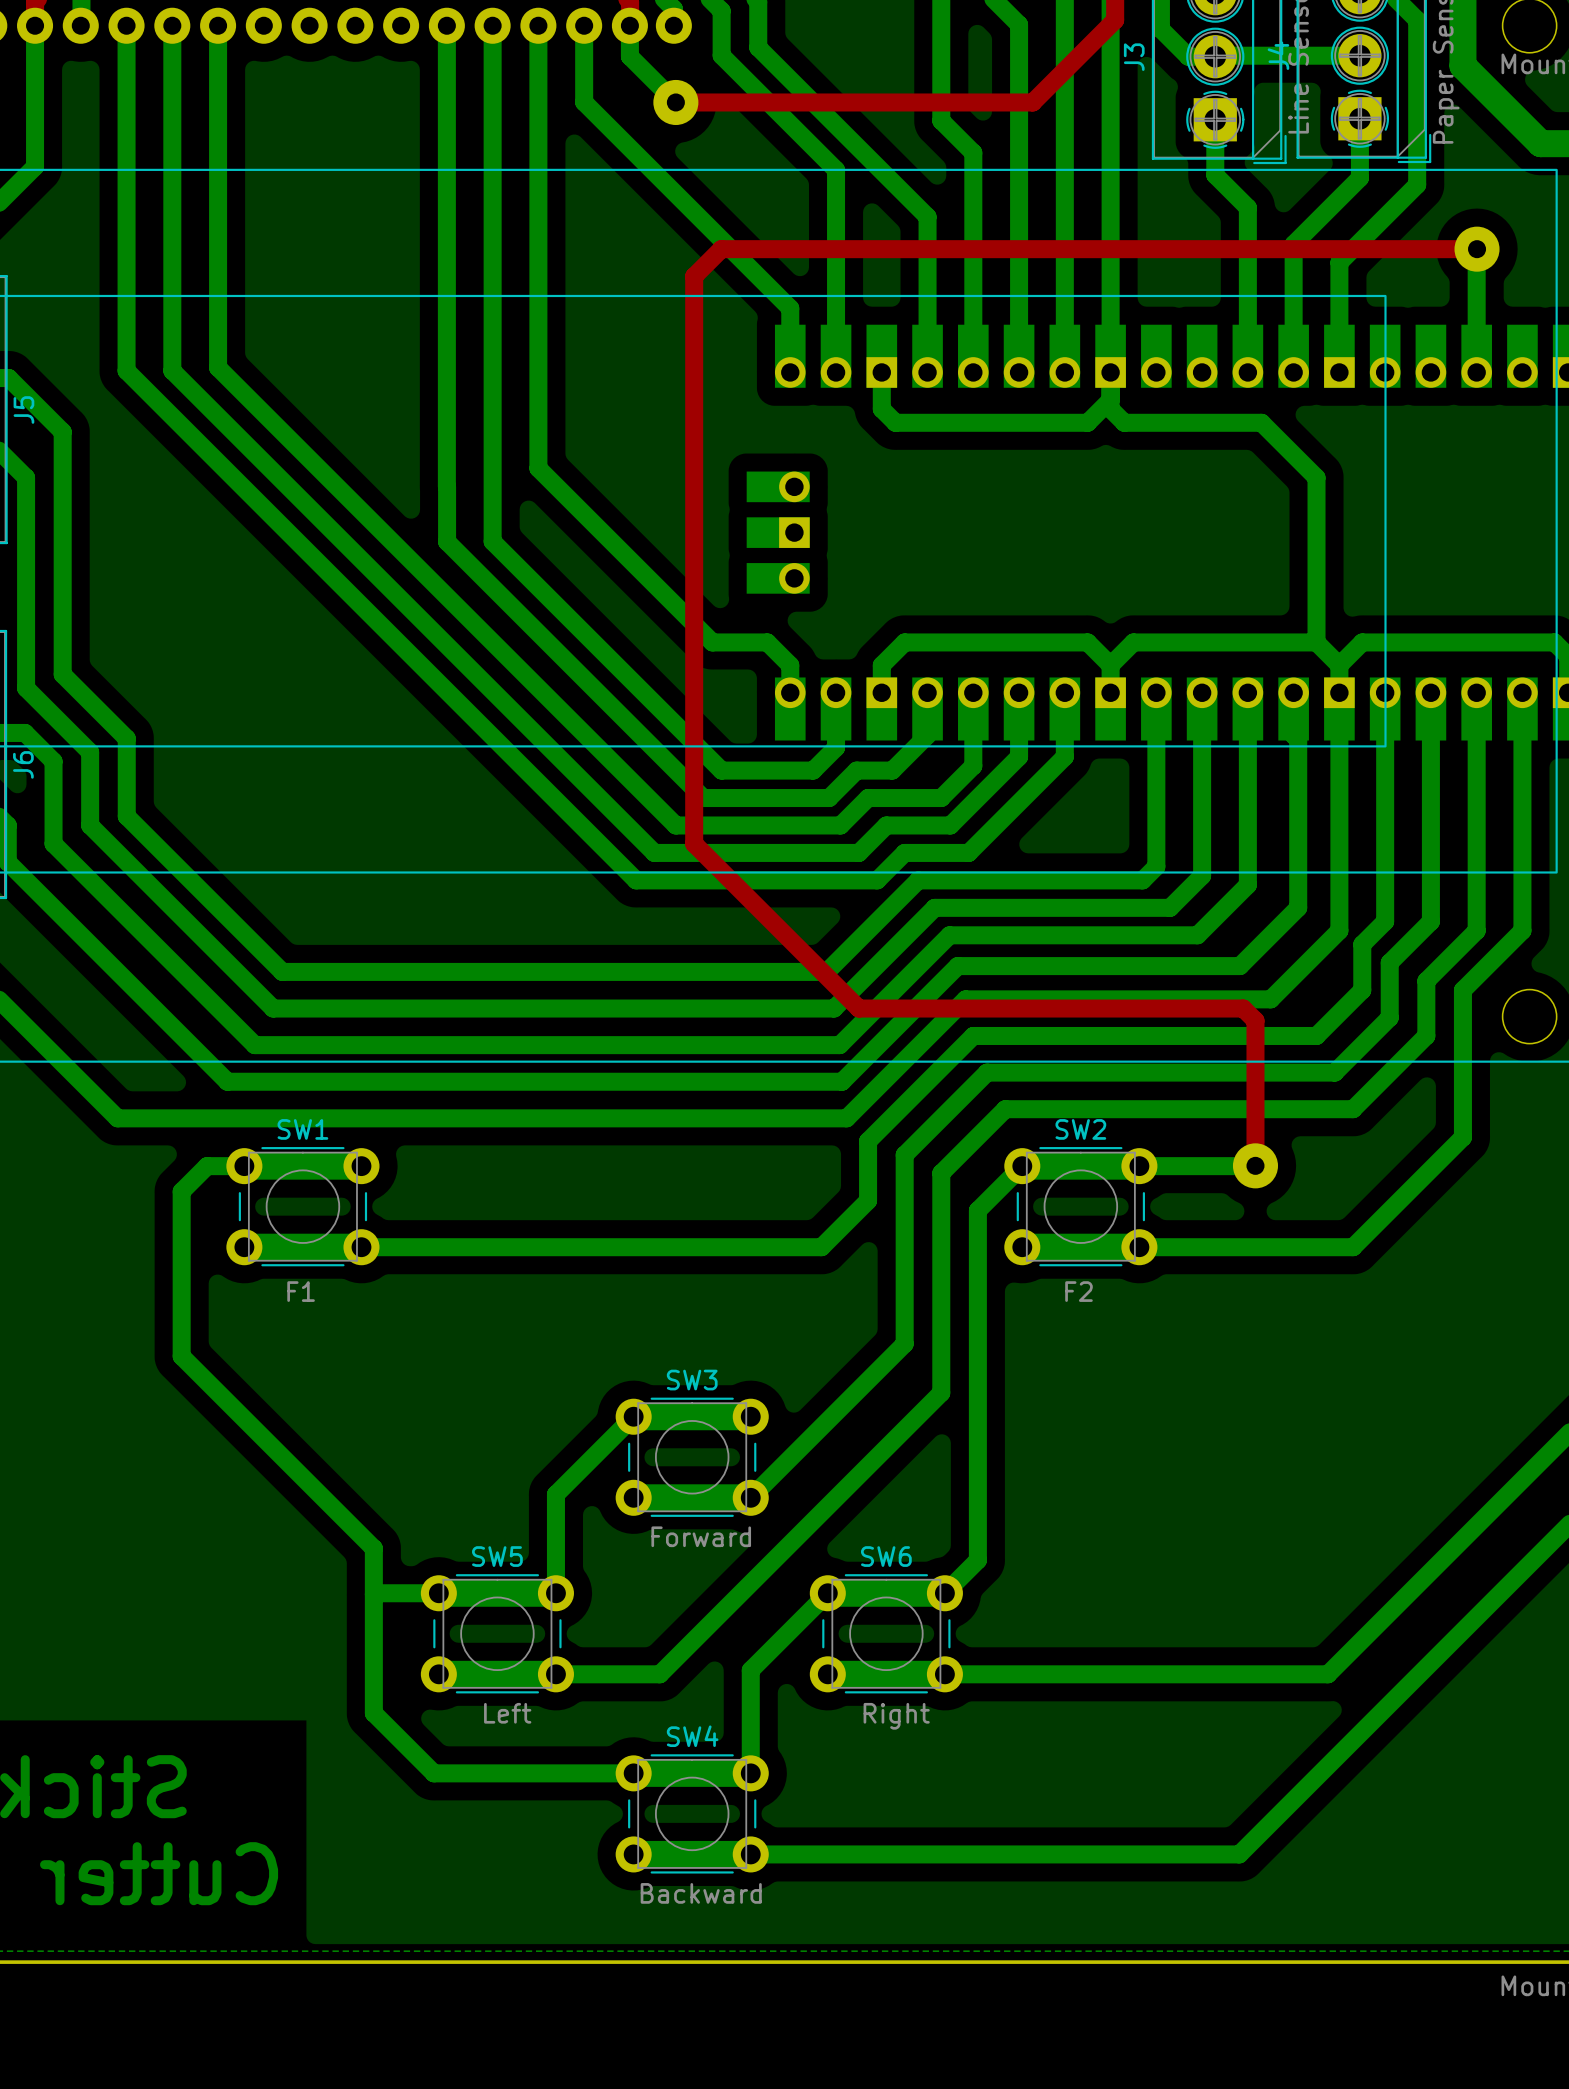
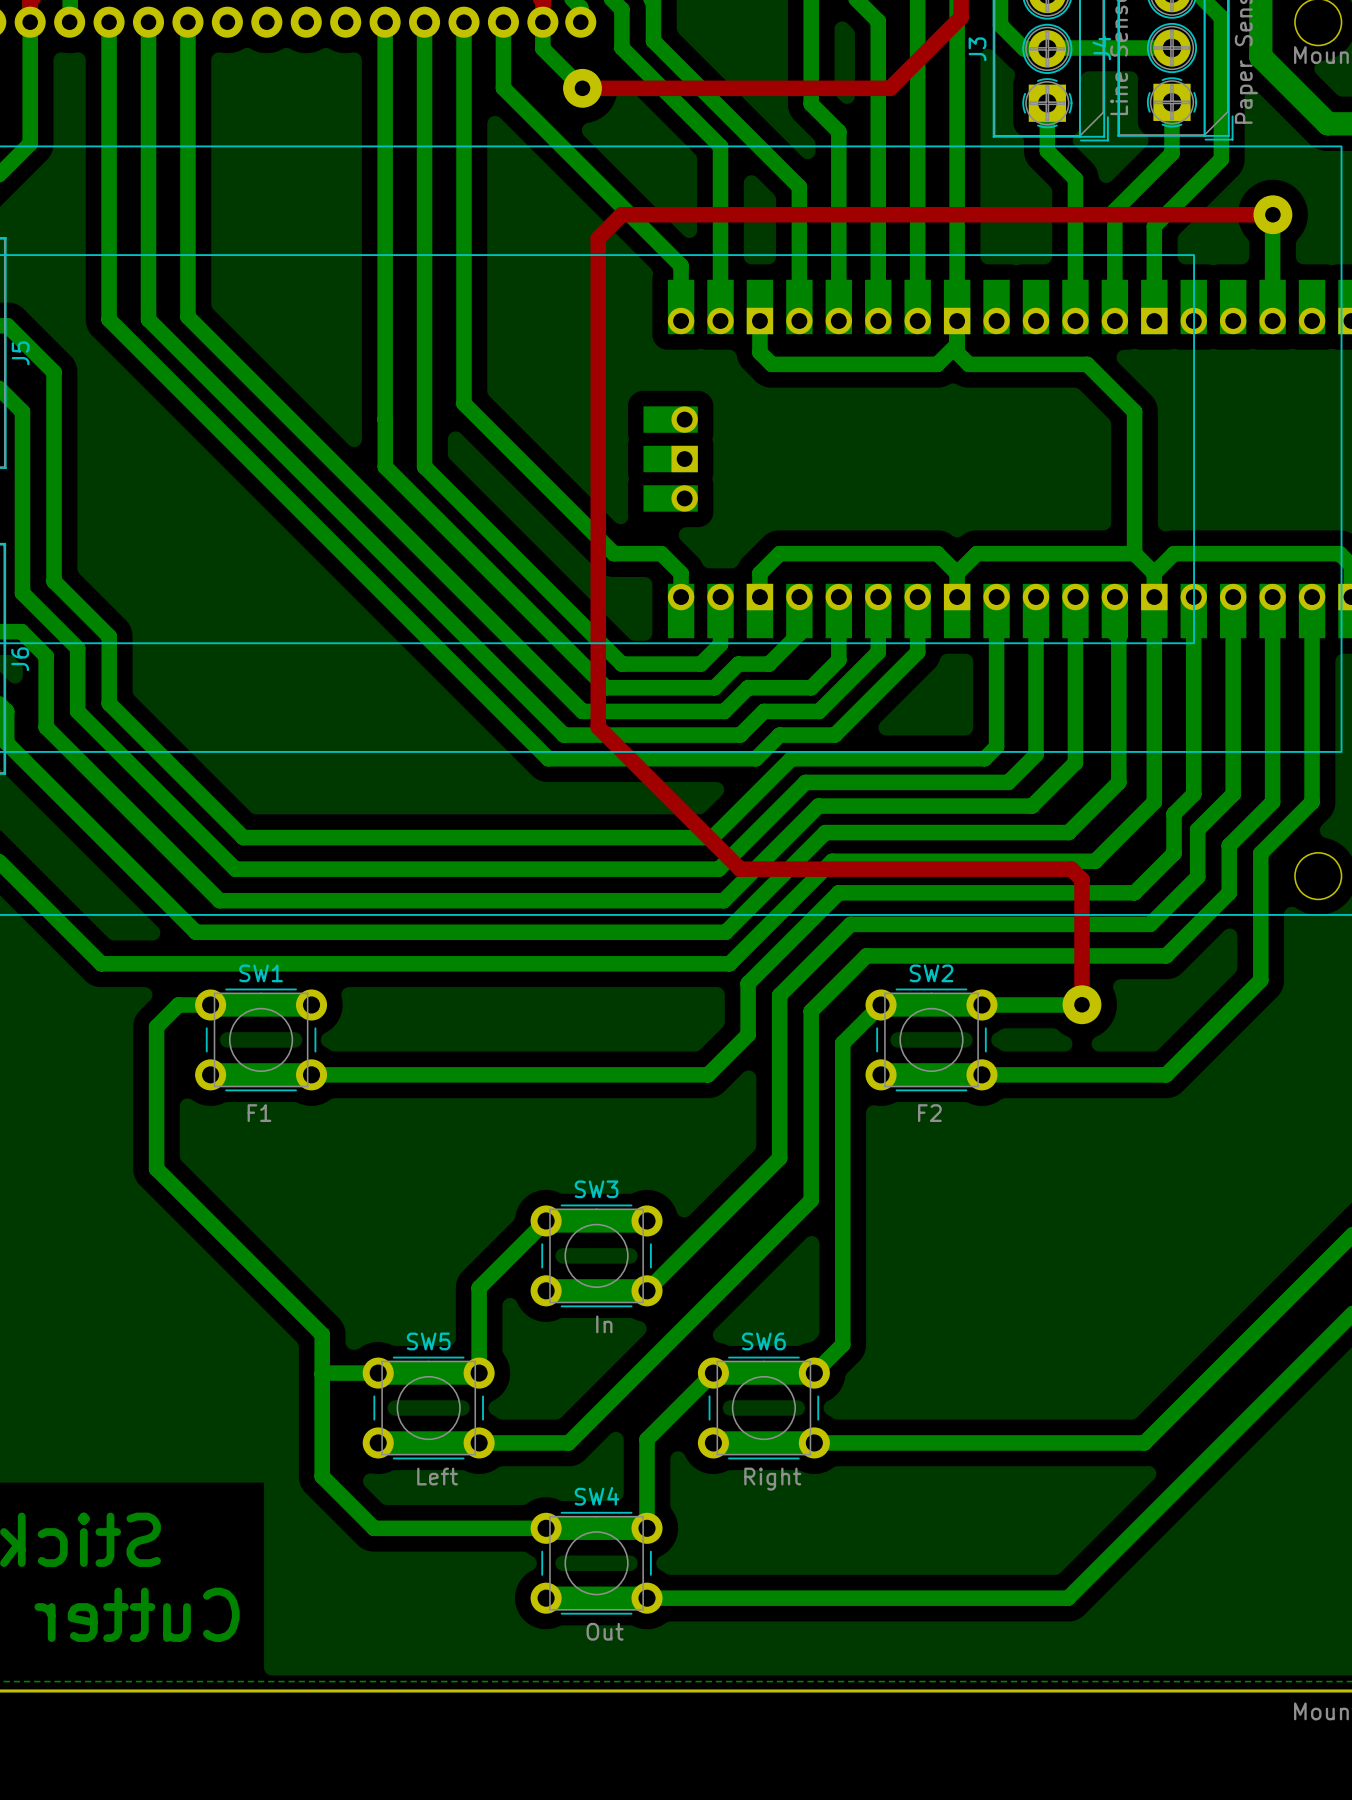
SW3 value: Forward (701, 1536) -> In (604, 1324)
SW4 value: Backward (701, 1893) -> Out (605, 1631)

